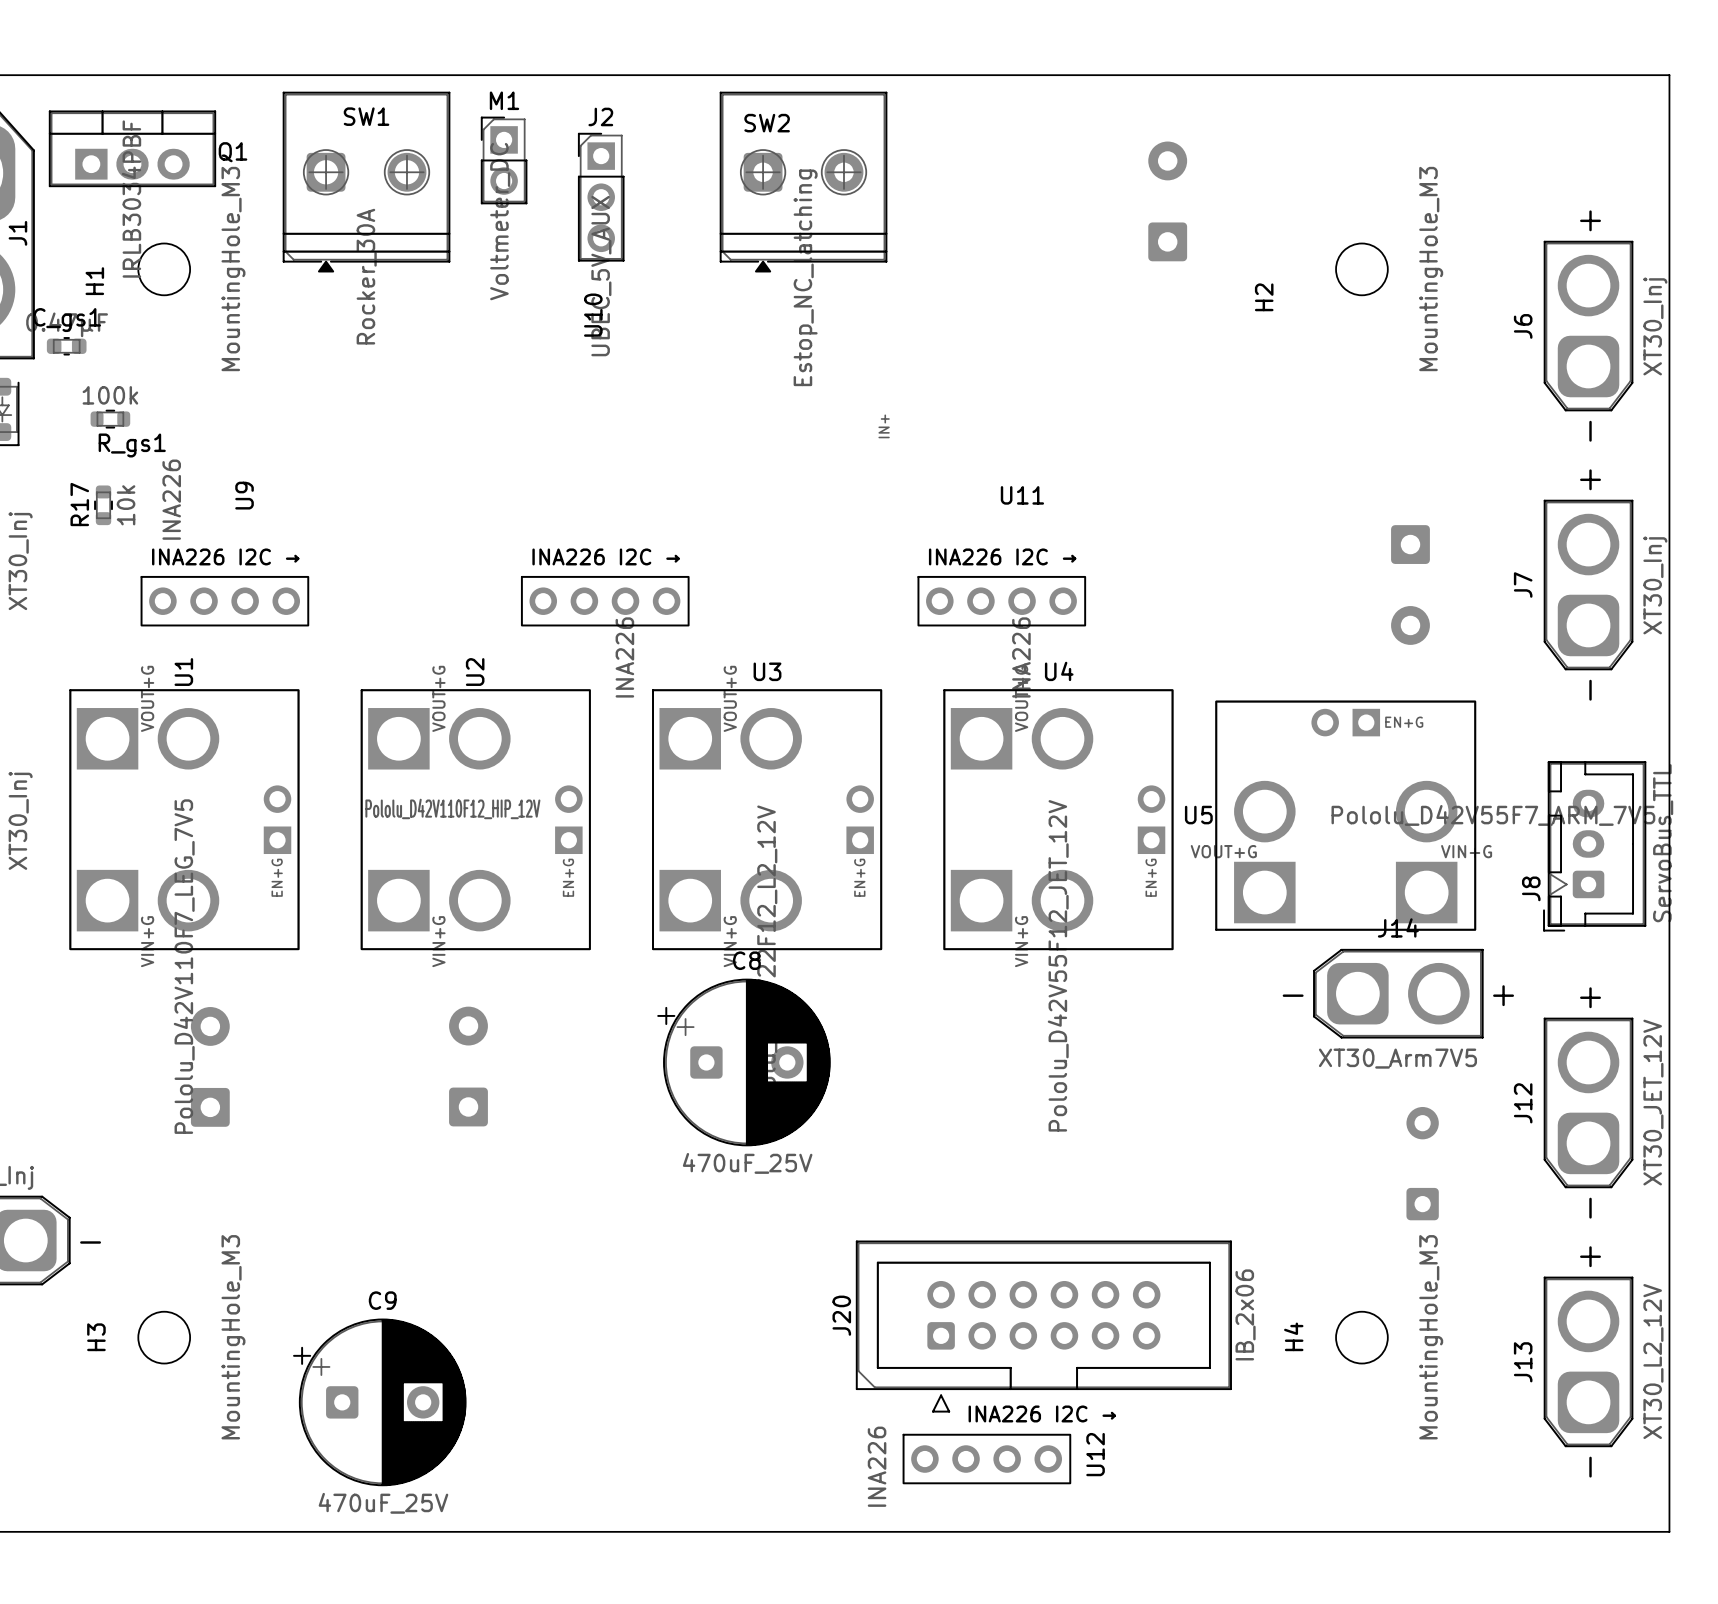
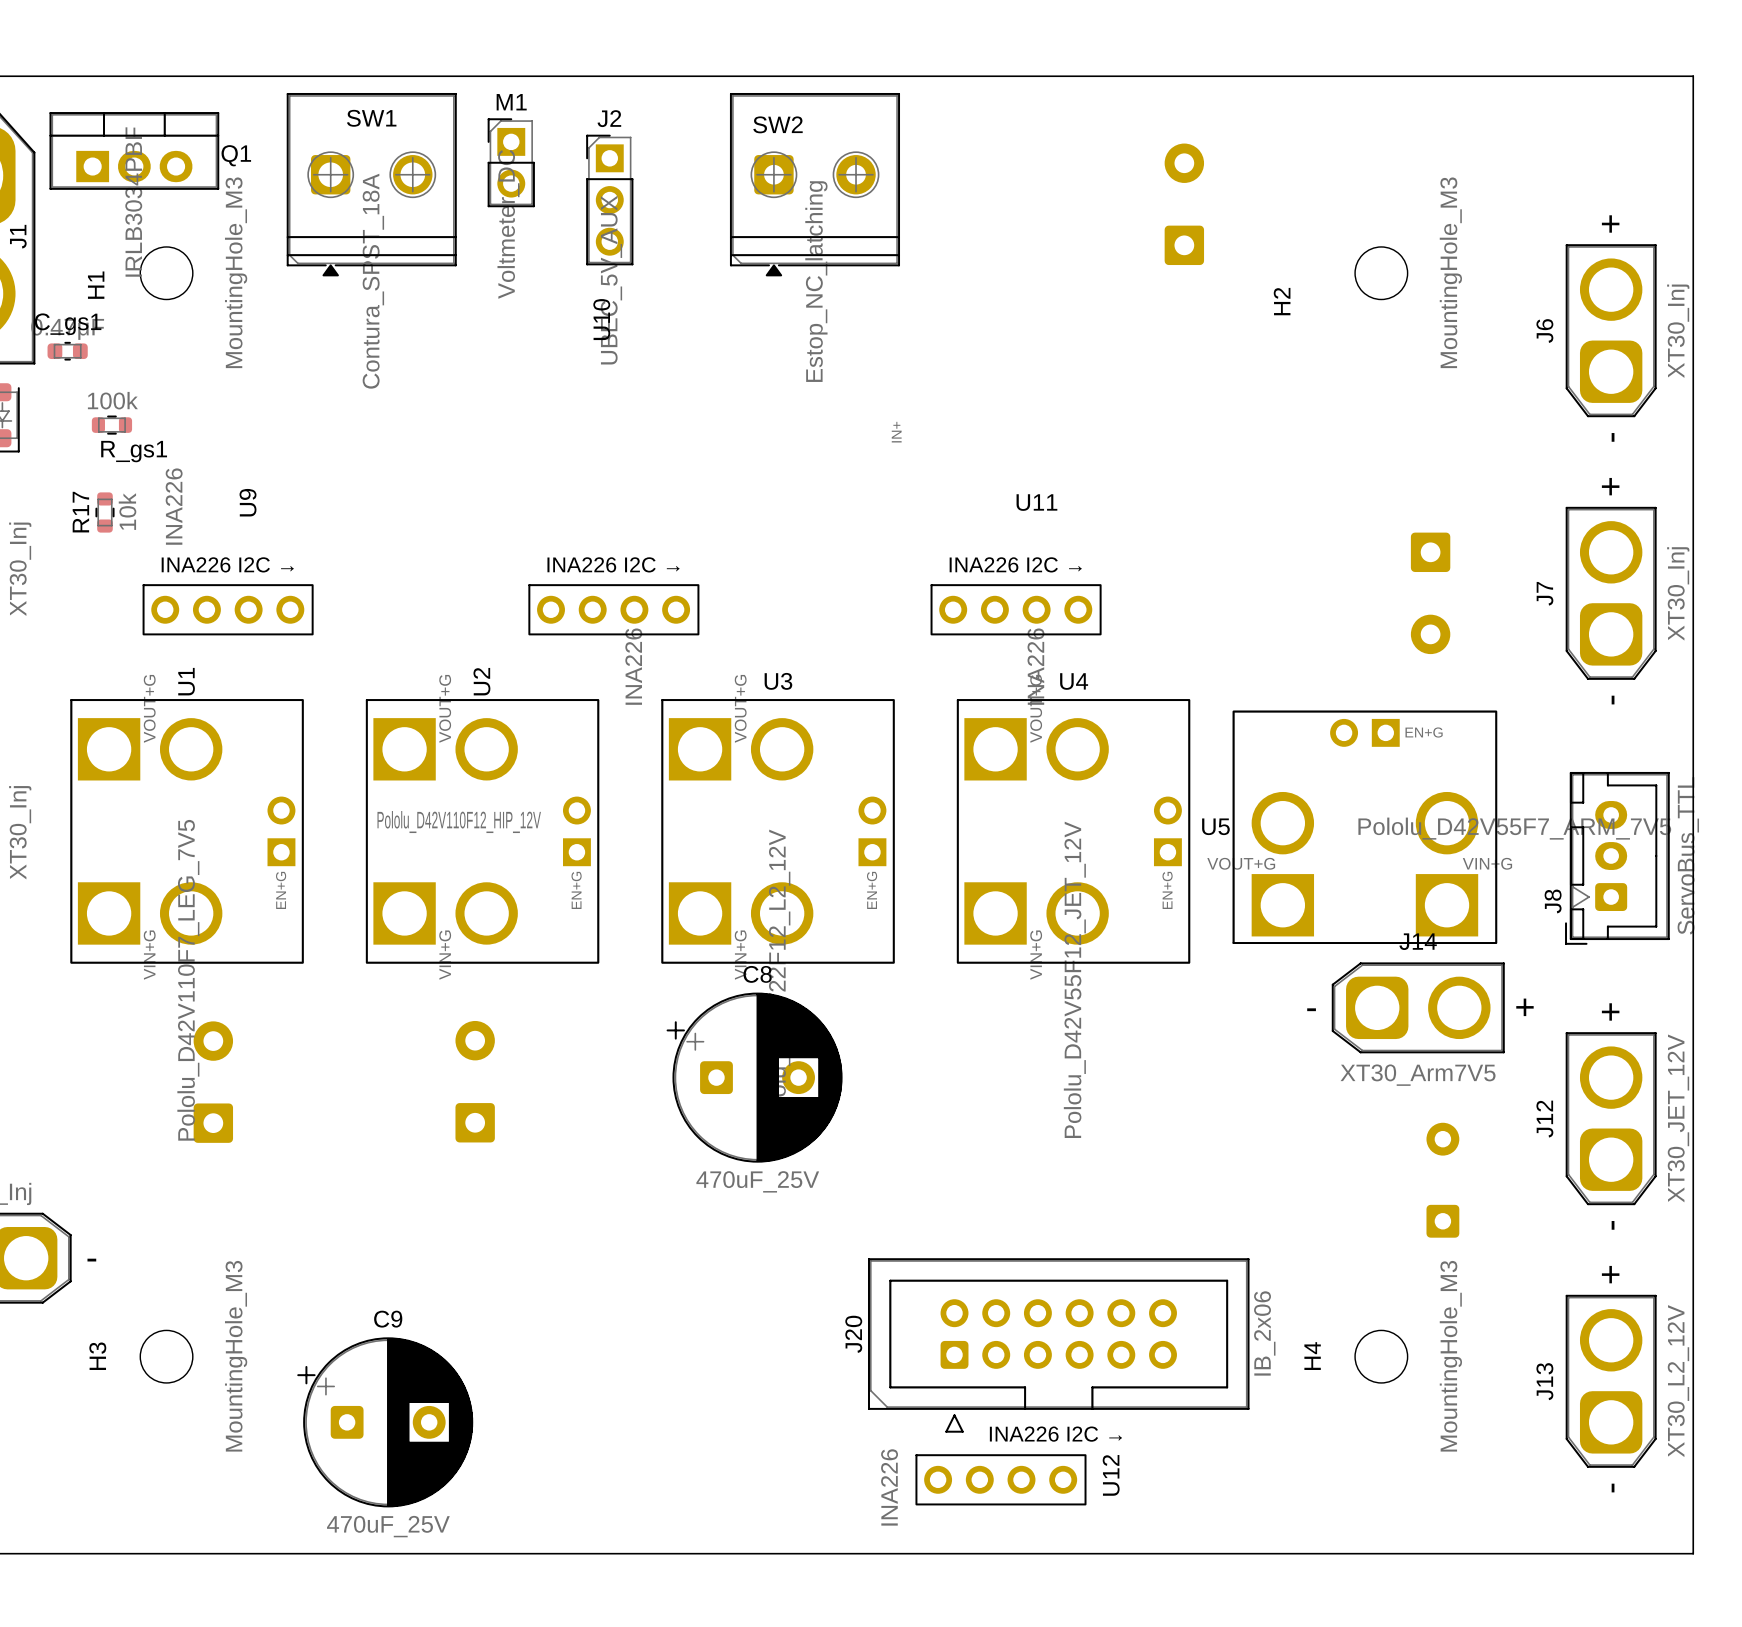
SW1 value: Rocker_30A (366, 276) -> Contura_SPST_18A (373, 281)

